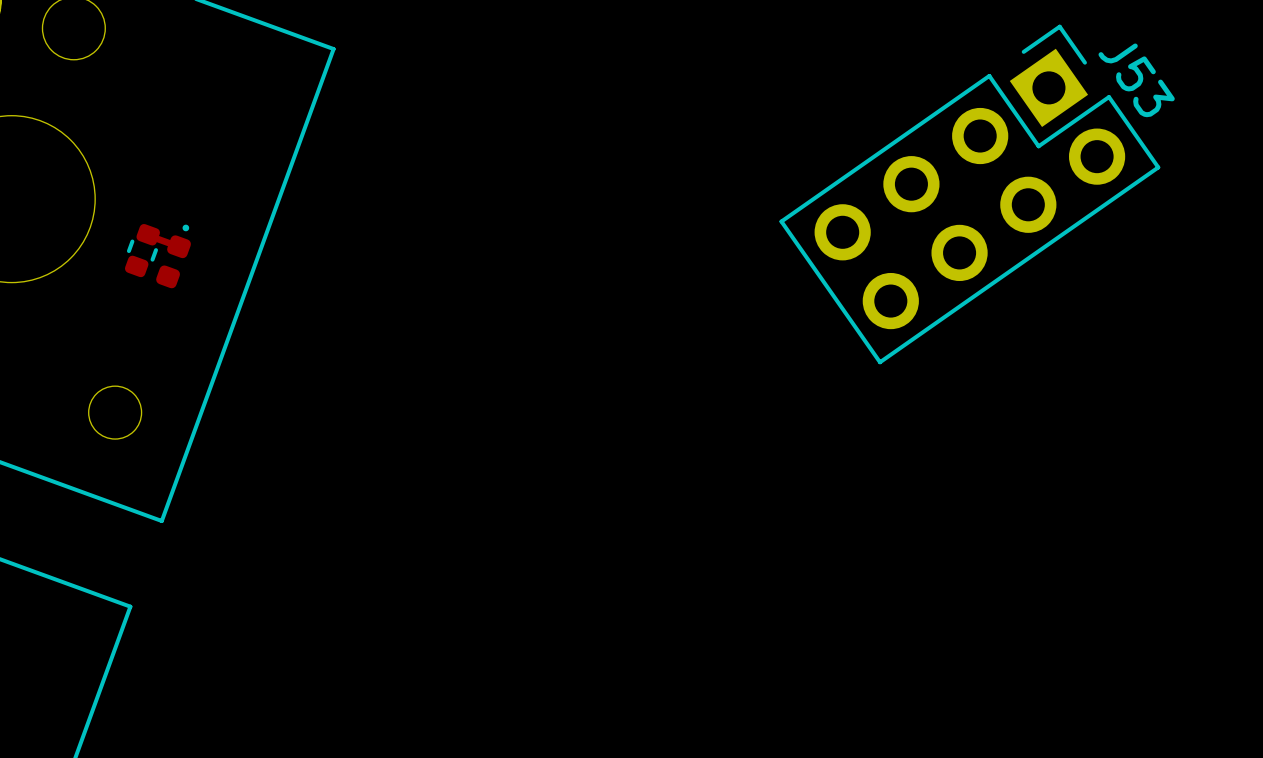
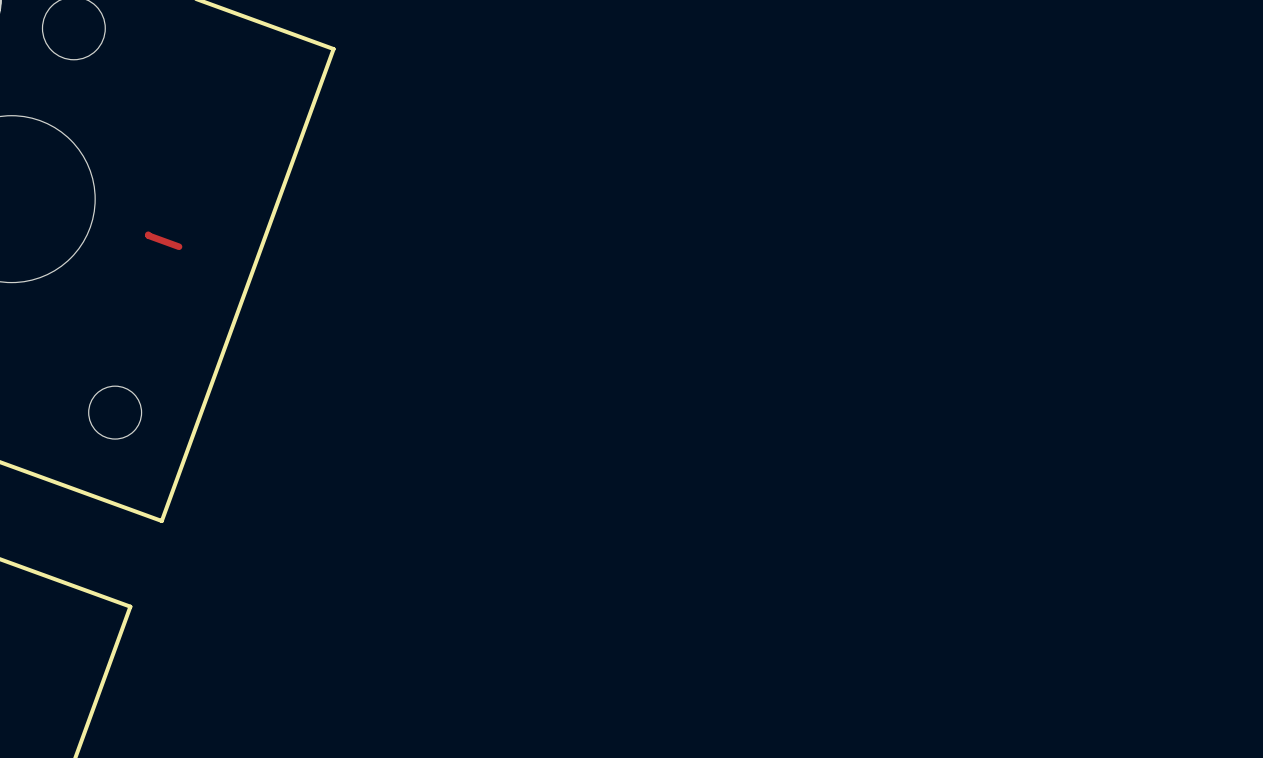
J53: (969, 194) -> none
part: (142, 250) -> none
part: (173, 256) -> none

